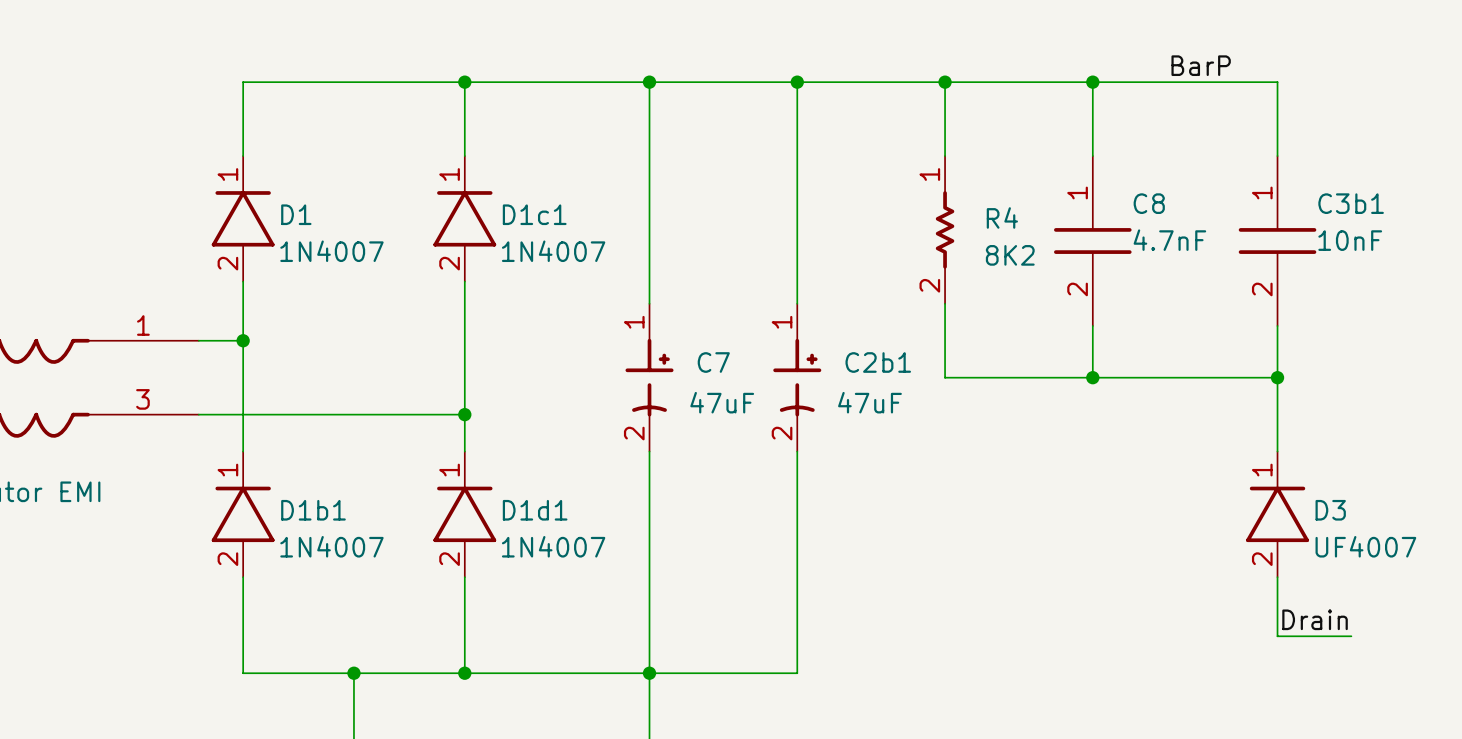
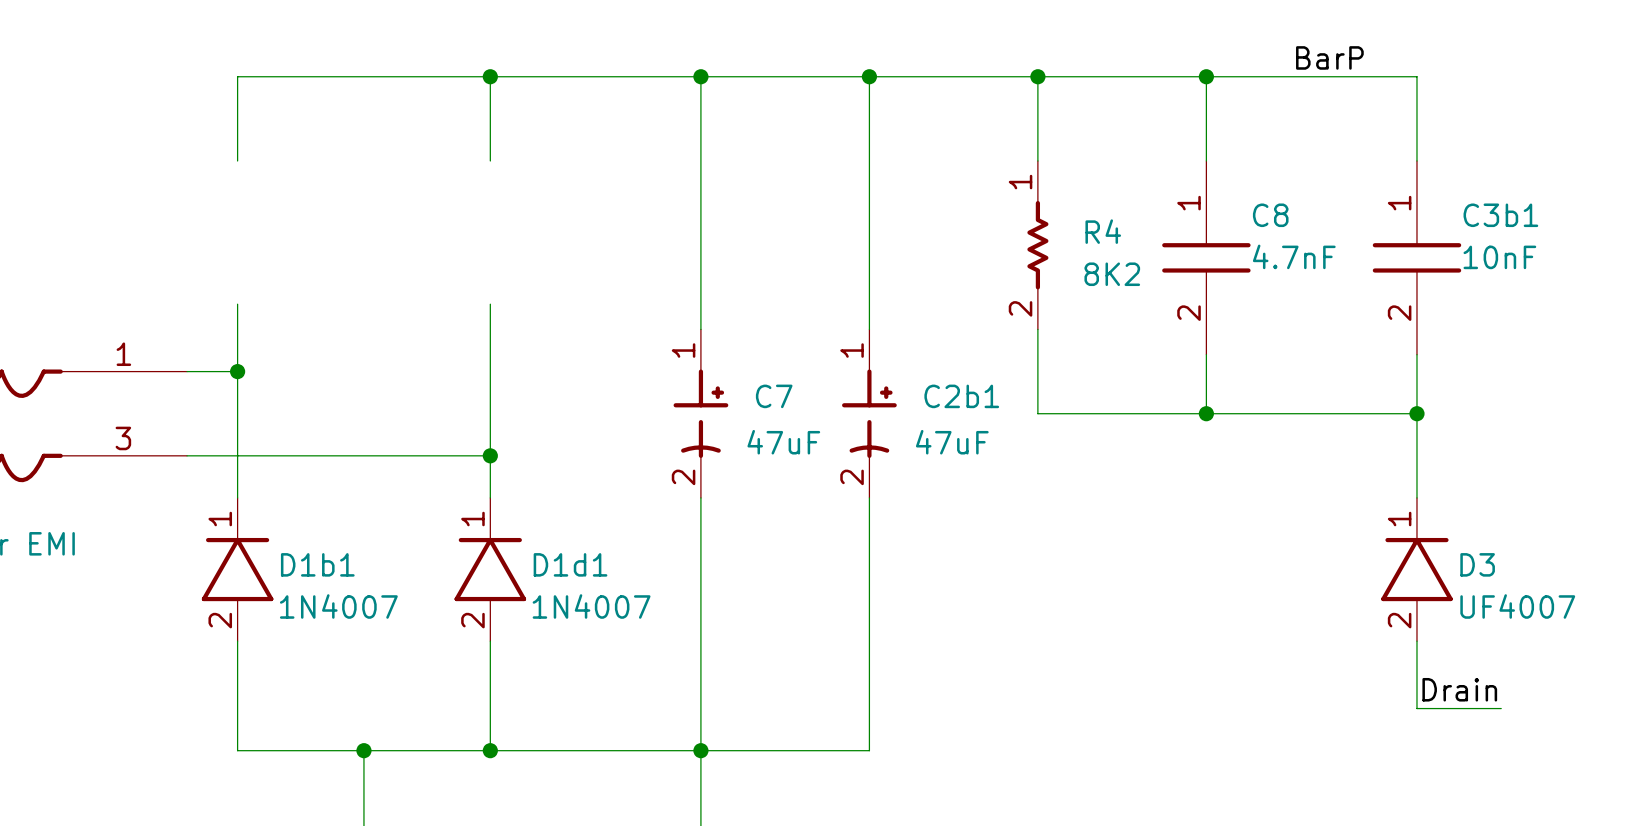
D1: 1N4007 (243, 218) -> none
D1c1: 1N4007 (464, 218) -> none

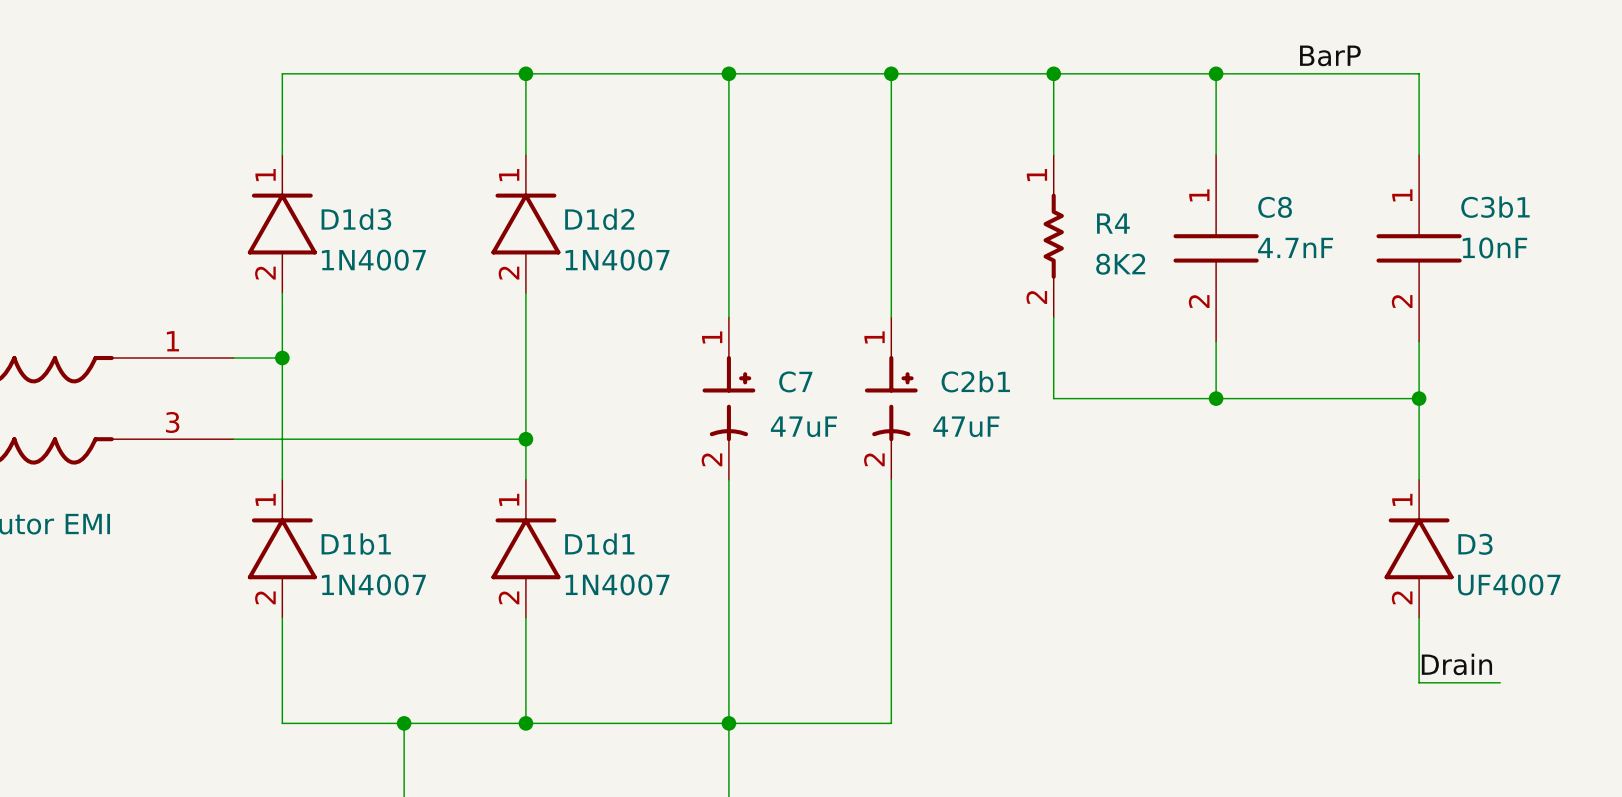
D1d3: none -> 1N4007 (282, 224)
D1d2: none -> 1N4007 (525, 224)

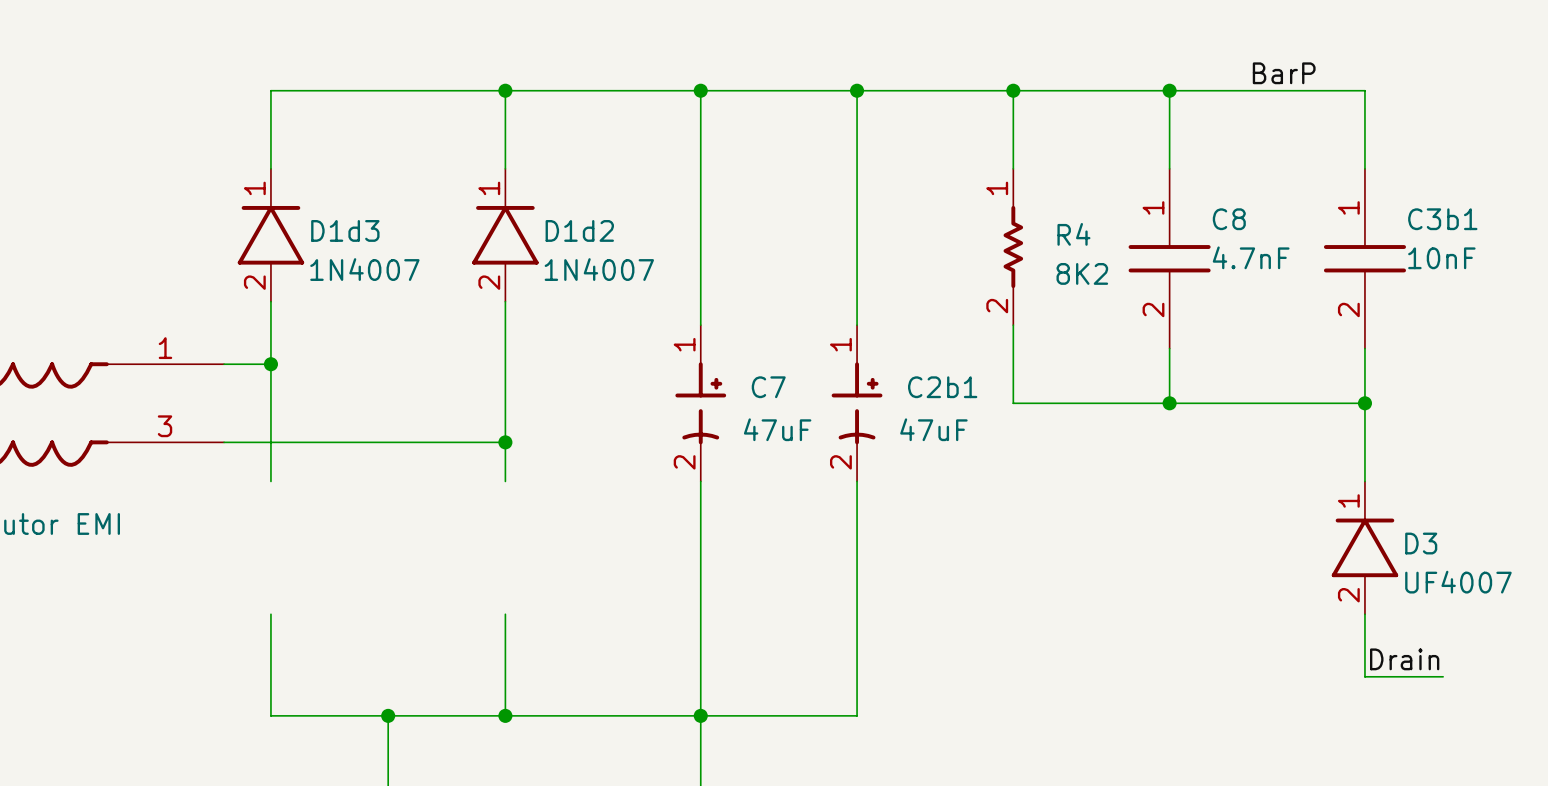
D1b1: 1N4007 (282, 548) -> none
D1d1: 1N4007 (525, 548) -> none

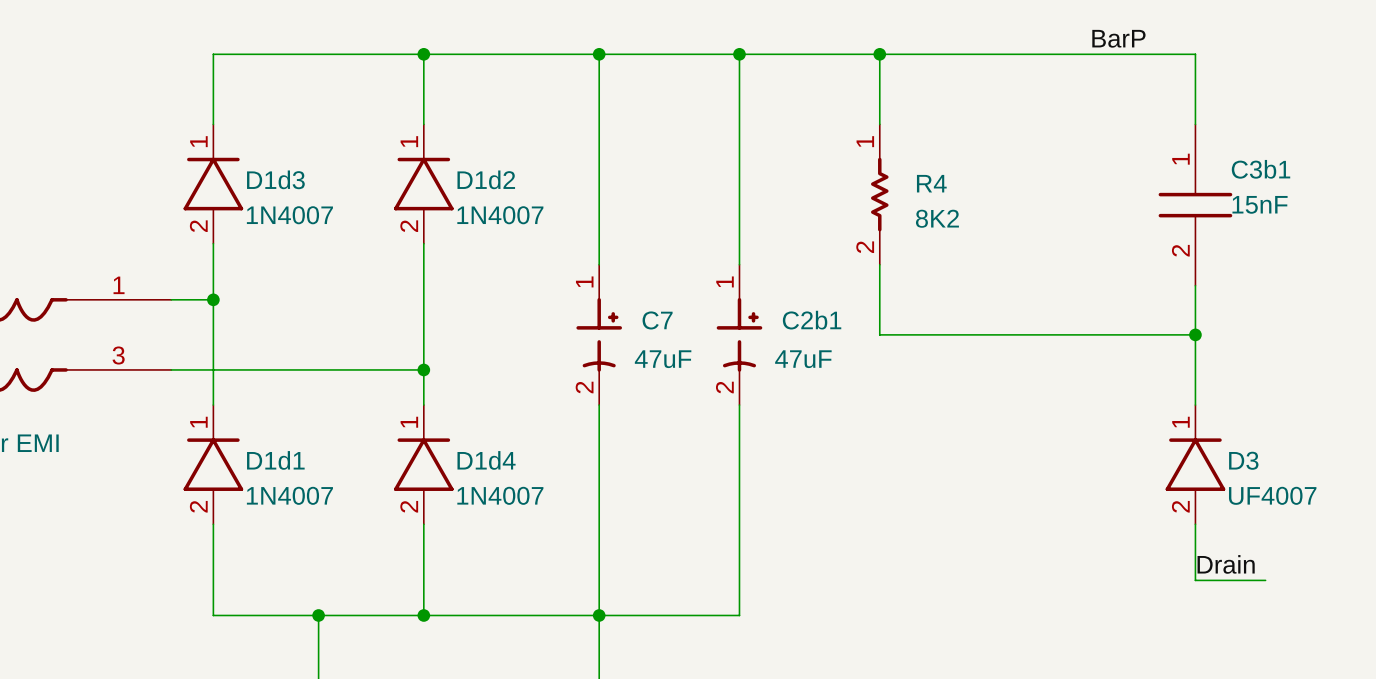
wire: (1169, 90) (1169, 168) -> none
junction: (1169, 90) -> none
C8: (1169, 258) -> none
C3b1 text: 10nF (1441, 258) -> 15nF (1260, 204)
wire: (1169, 348) (1169, 403) -> none
junction: (1169, 403) -> none
D1d1: none -> 1N4007 (213, 464)
D1d4: none -> 1N4007 (423, 464)

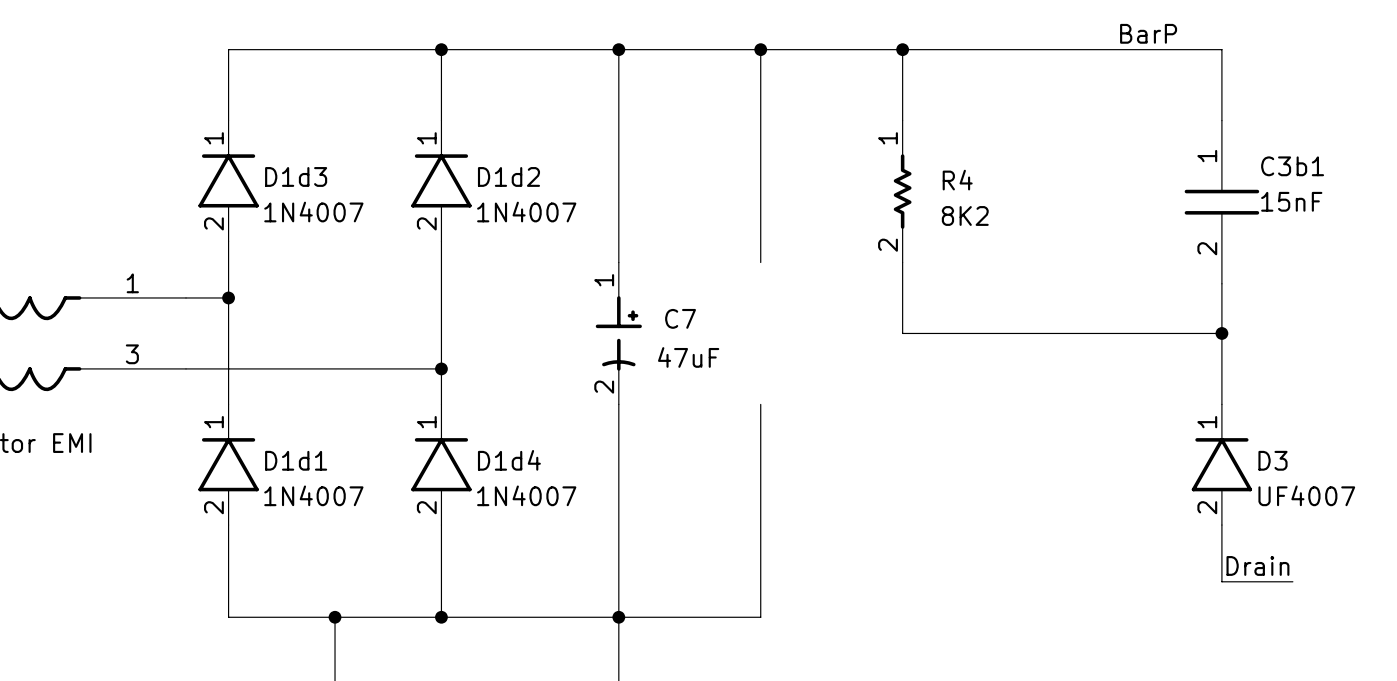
C2b1: (739, 334) -> none

